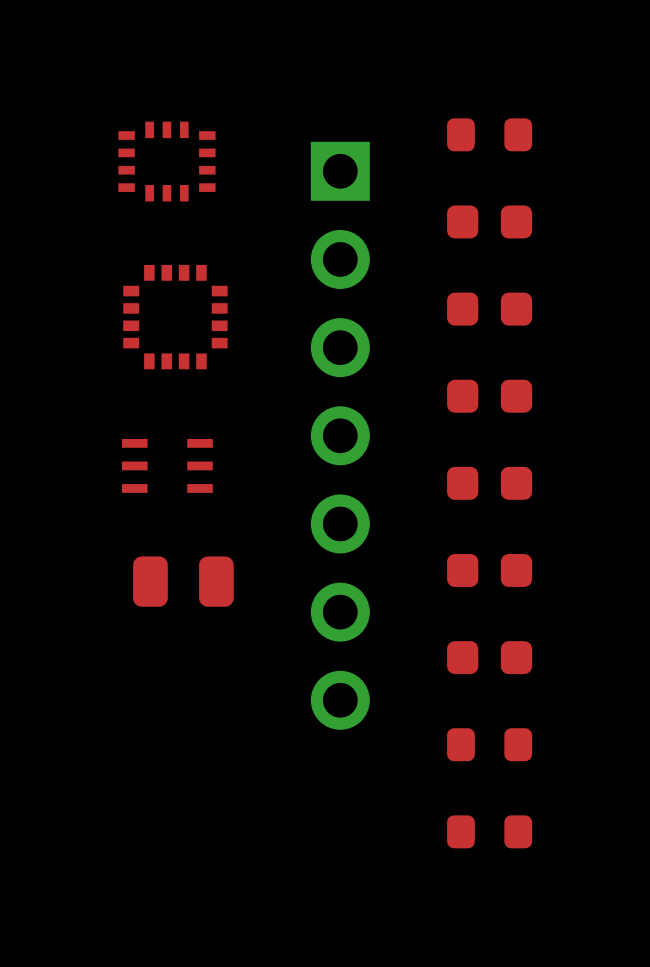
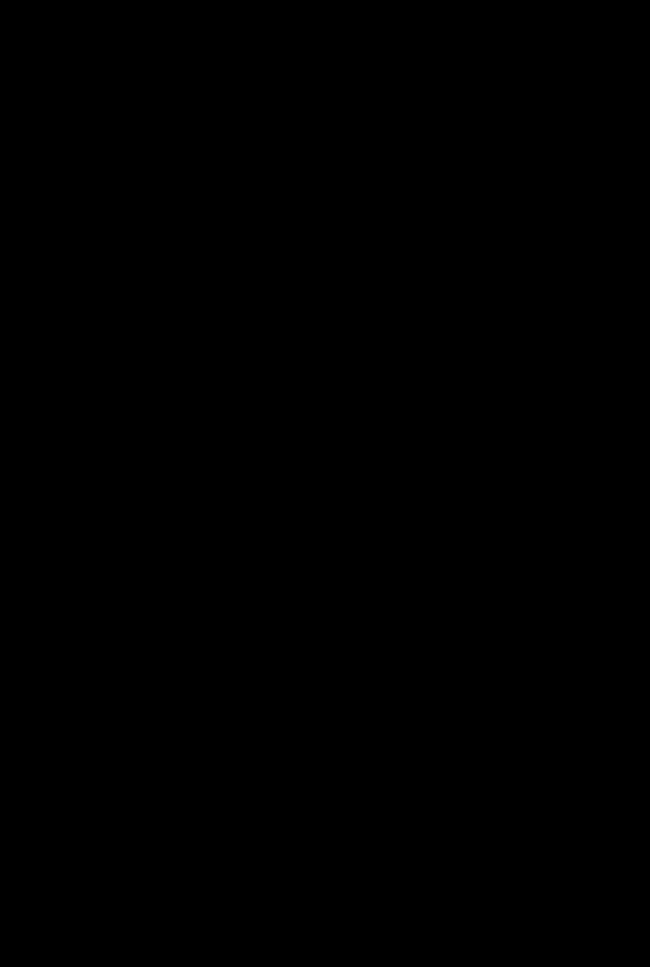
part: (489, 134) -> none
part: (166, 161) -> none
part: (489, 221) -> none
part: (489, 309) -> none
part: (175, 317) -> none
part: (489, 396) -> none
part: (340, 435) -> none
part: (167, 465) -> none
part: (489, 483) -> none
part: (489, 570) -> none
part: (183, 581) -> none
part: (489, 657) -> none
part: (489, 744) -> none
part: (489, 831) -> none

